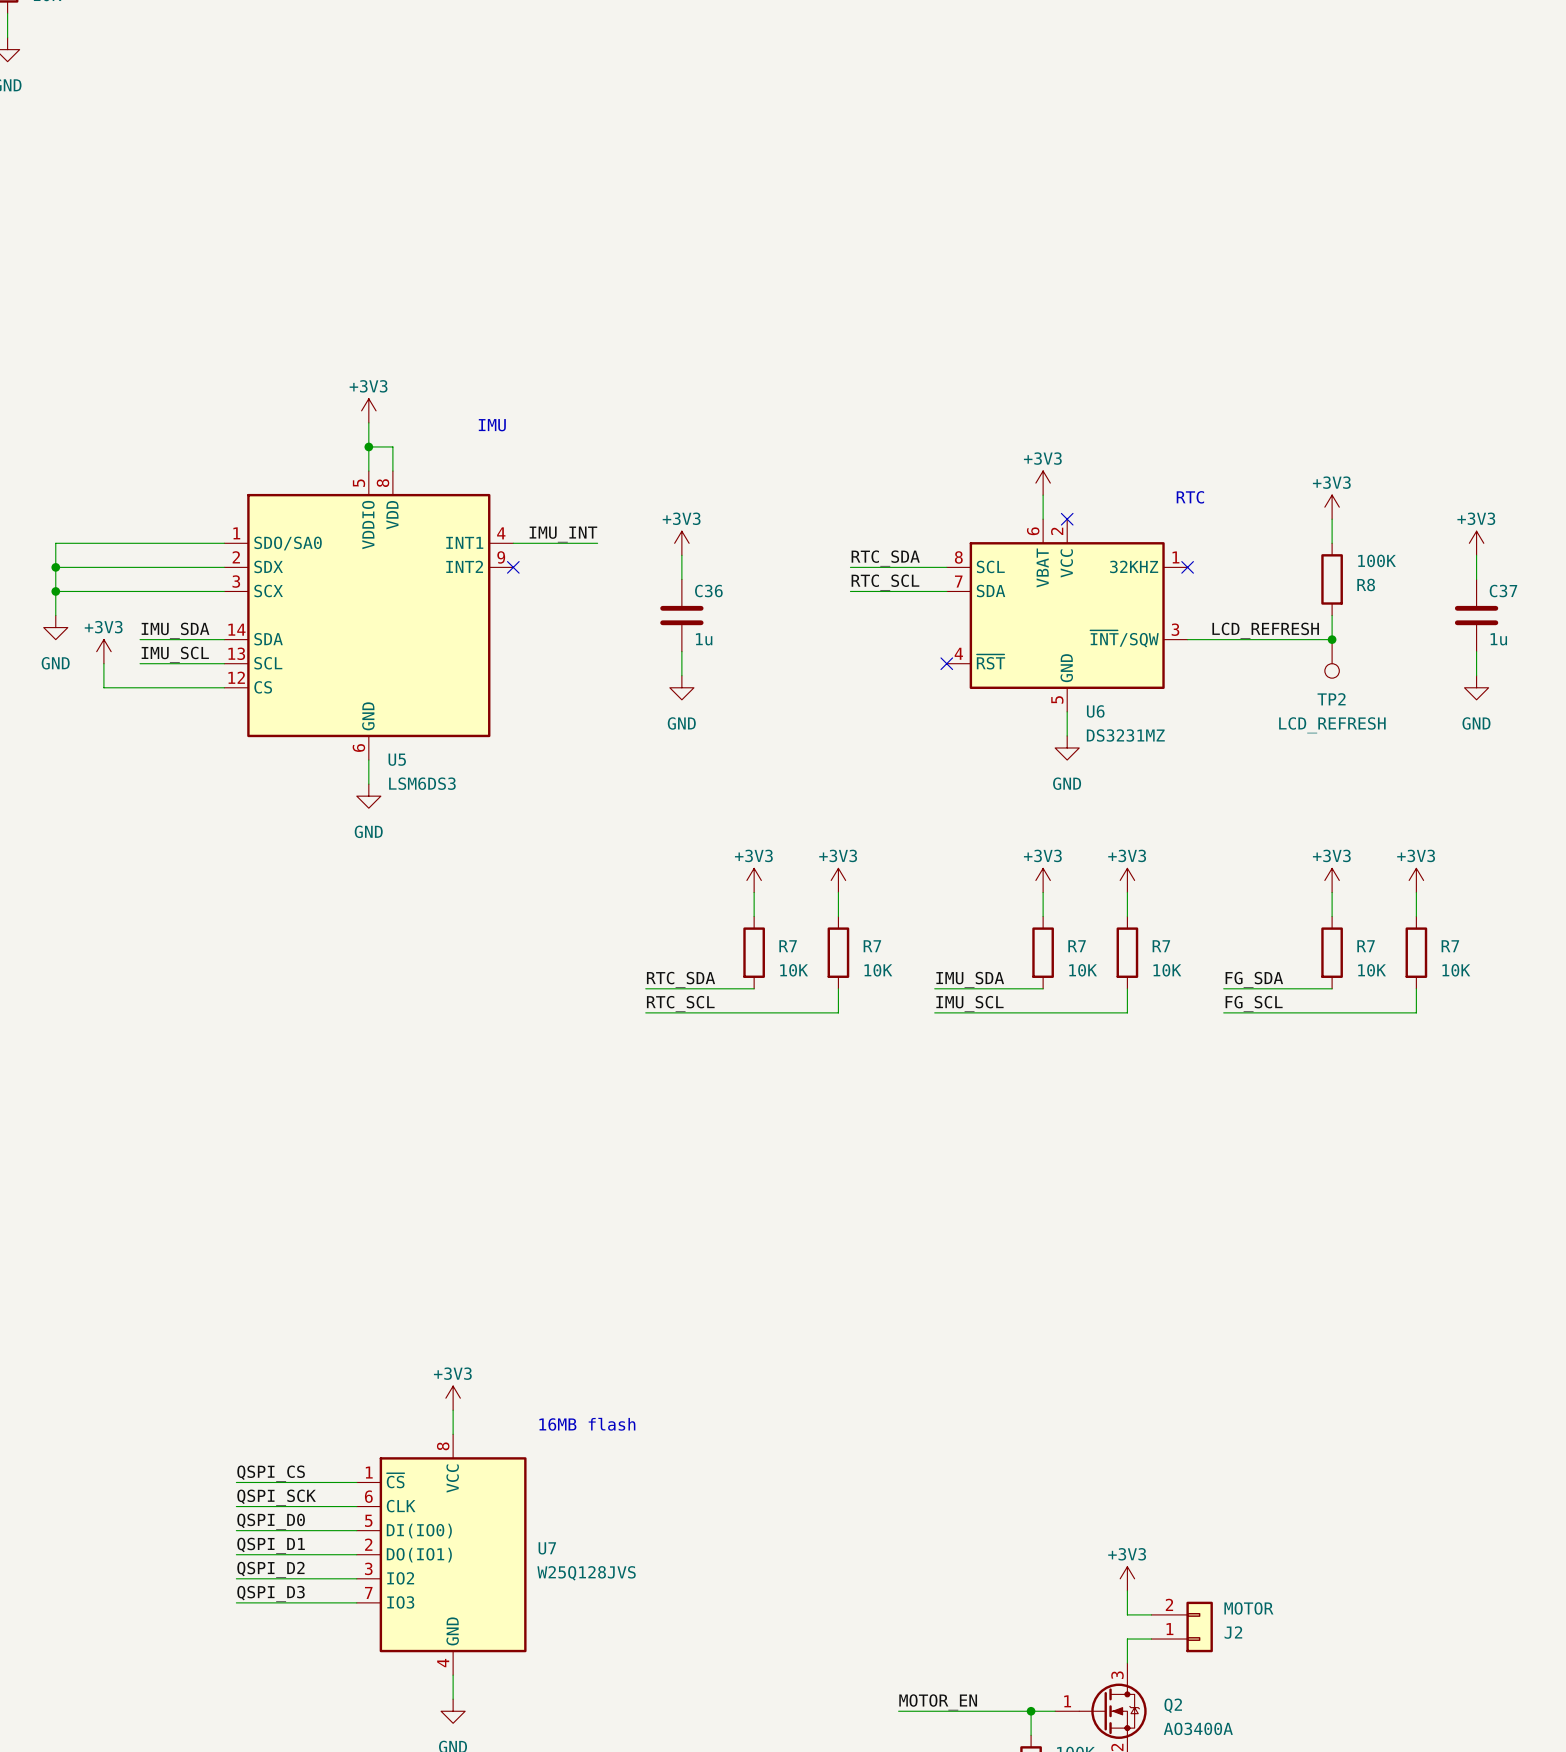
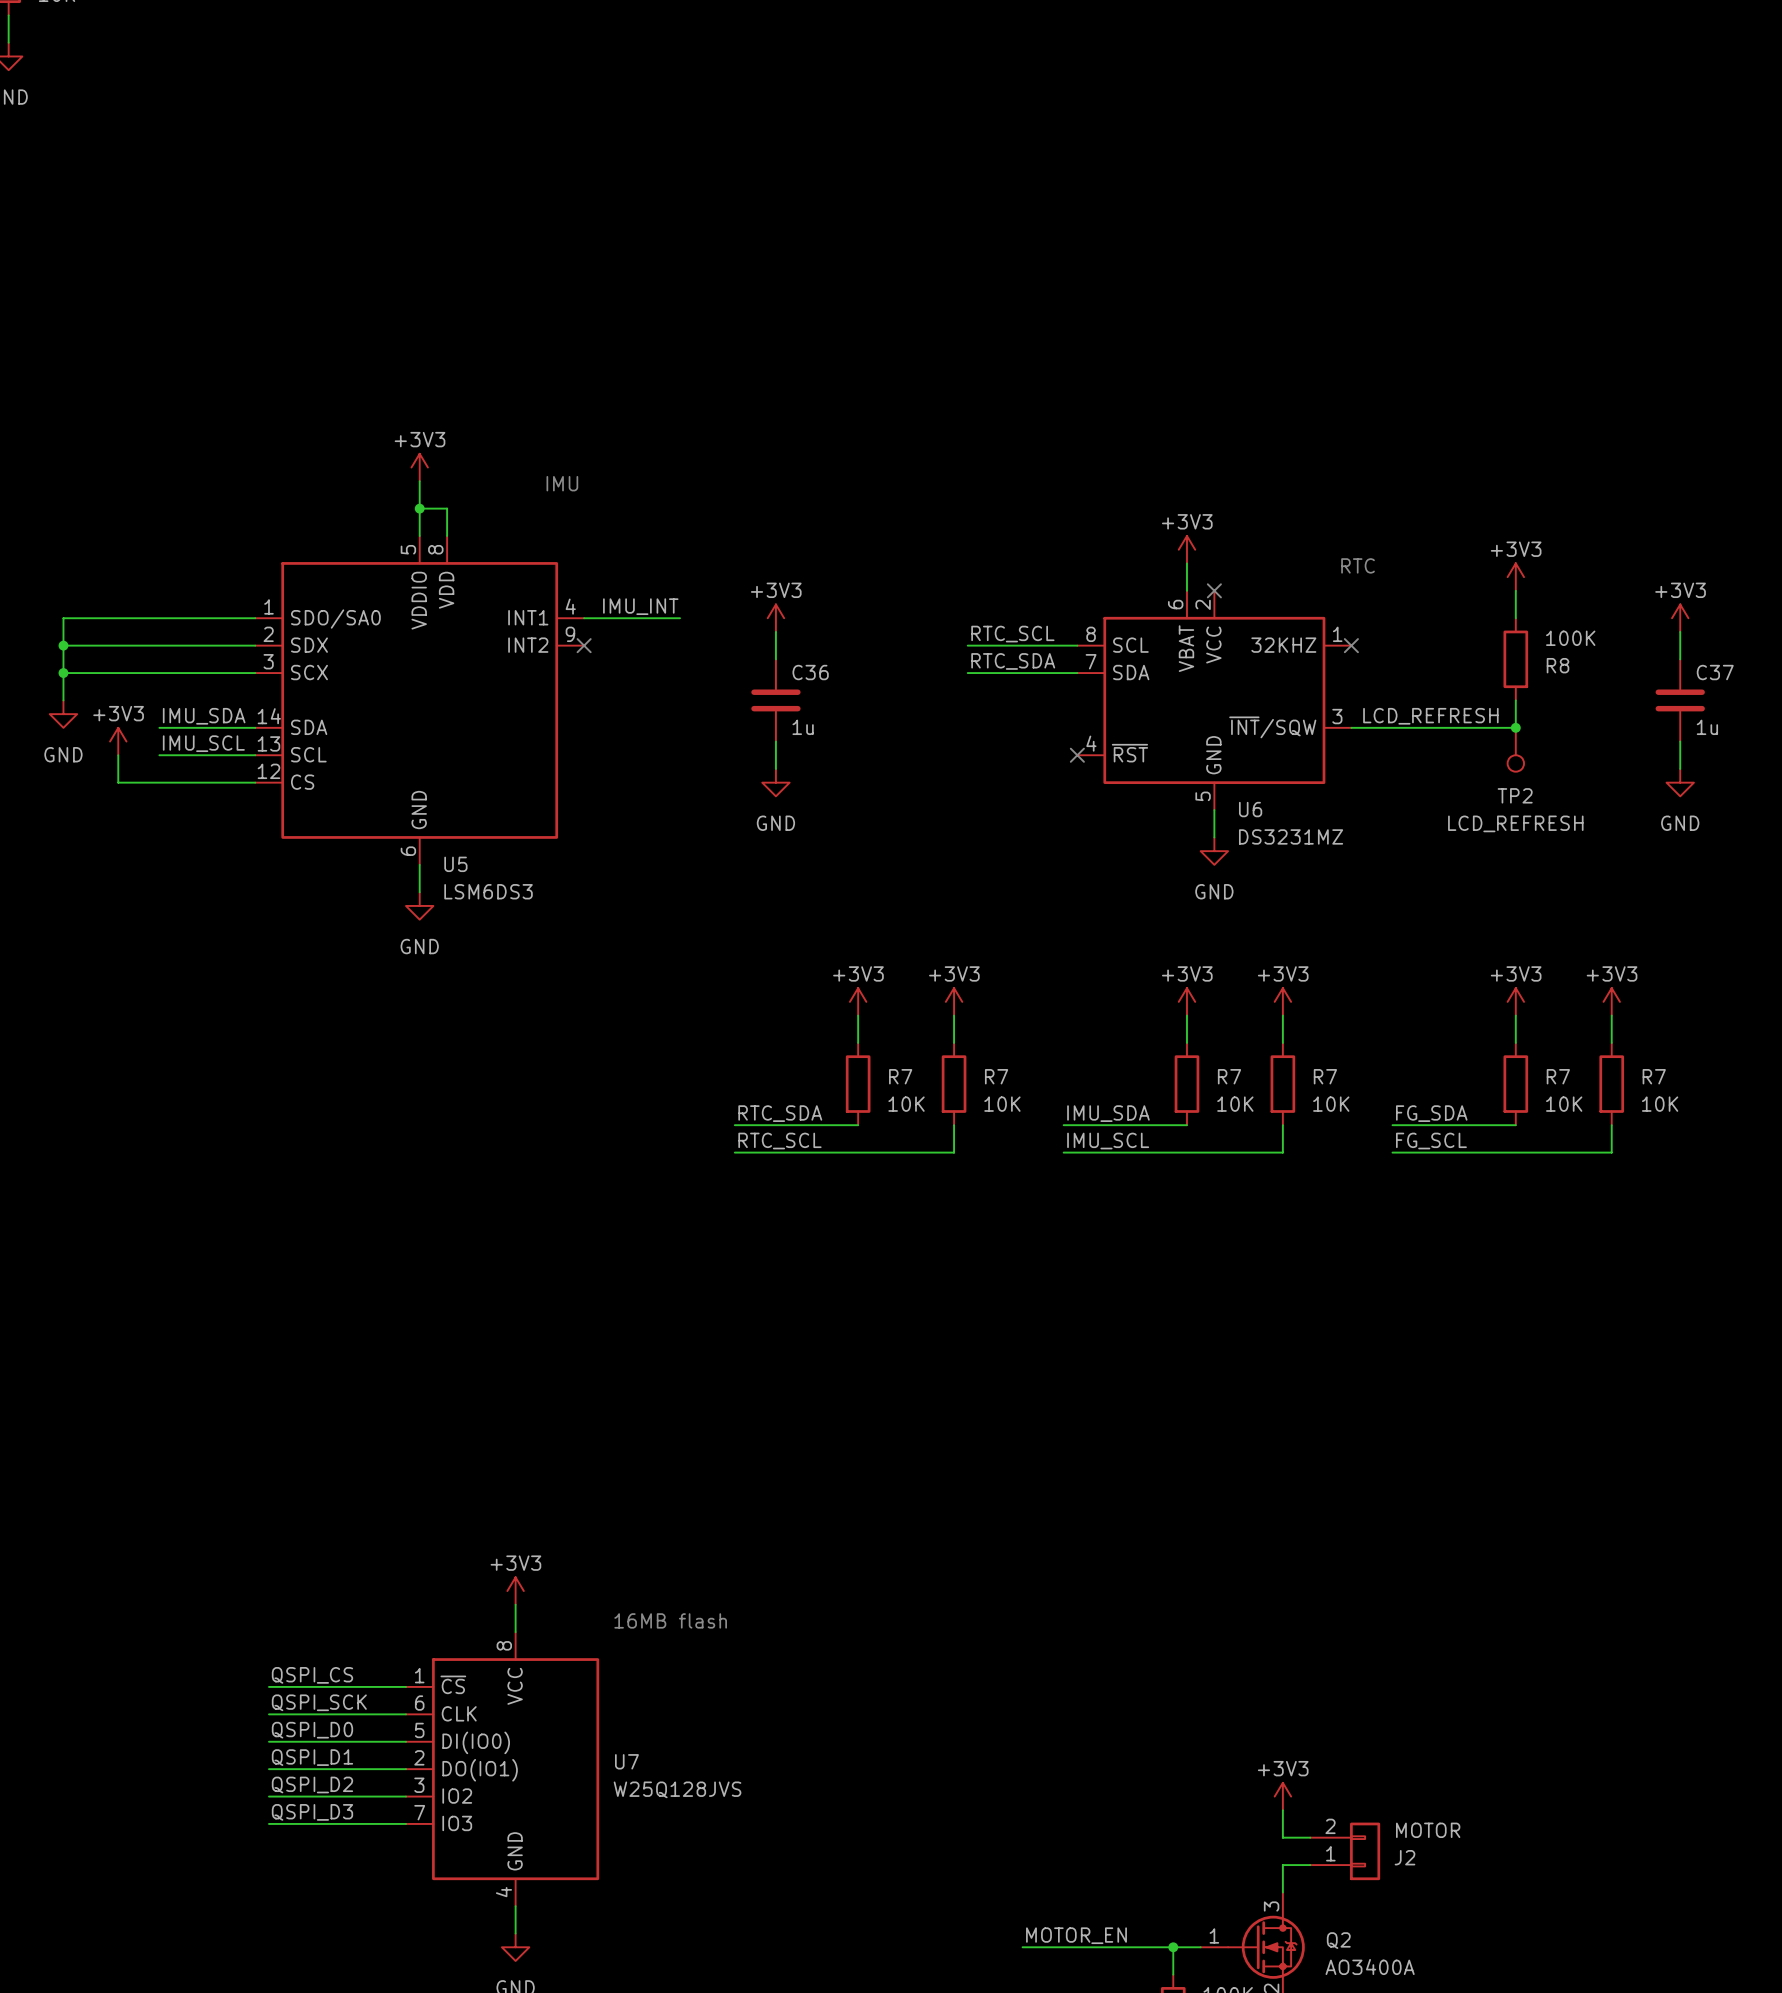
label: RTC_SDA (885, 558) -> RTC_SCL (1012, 634)
label: RTC_SCL (885, 582) -> RTC_SDA (1013, 661)

